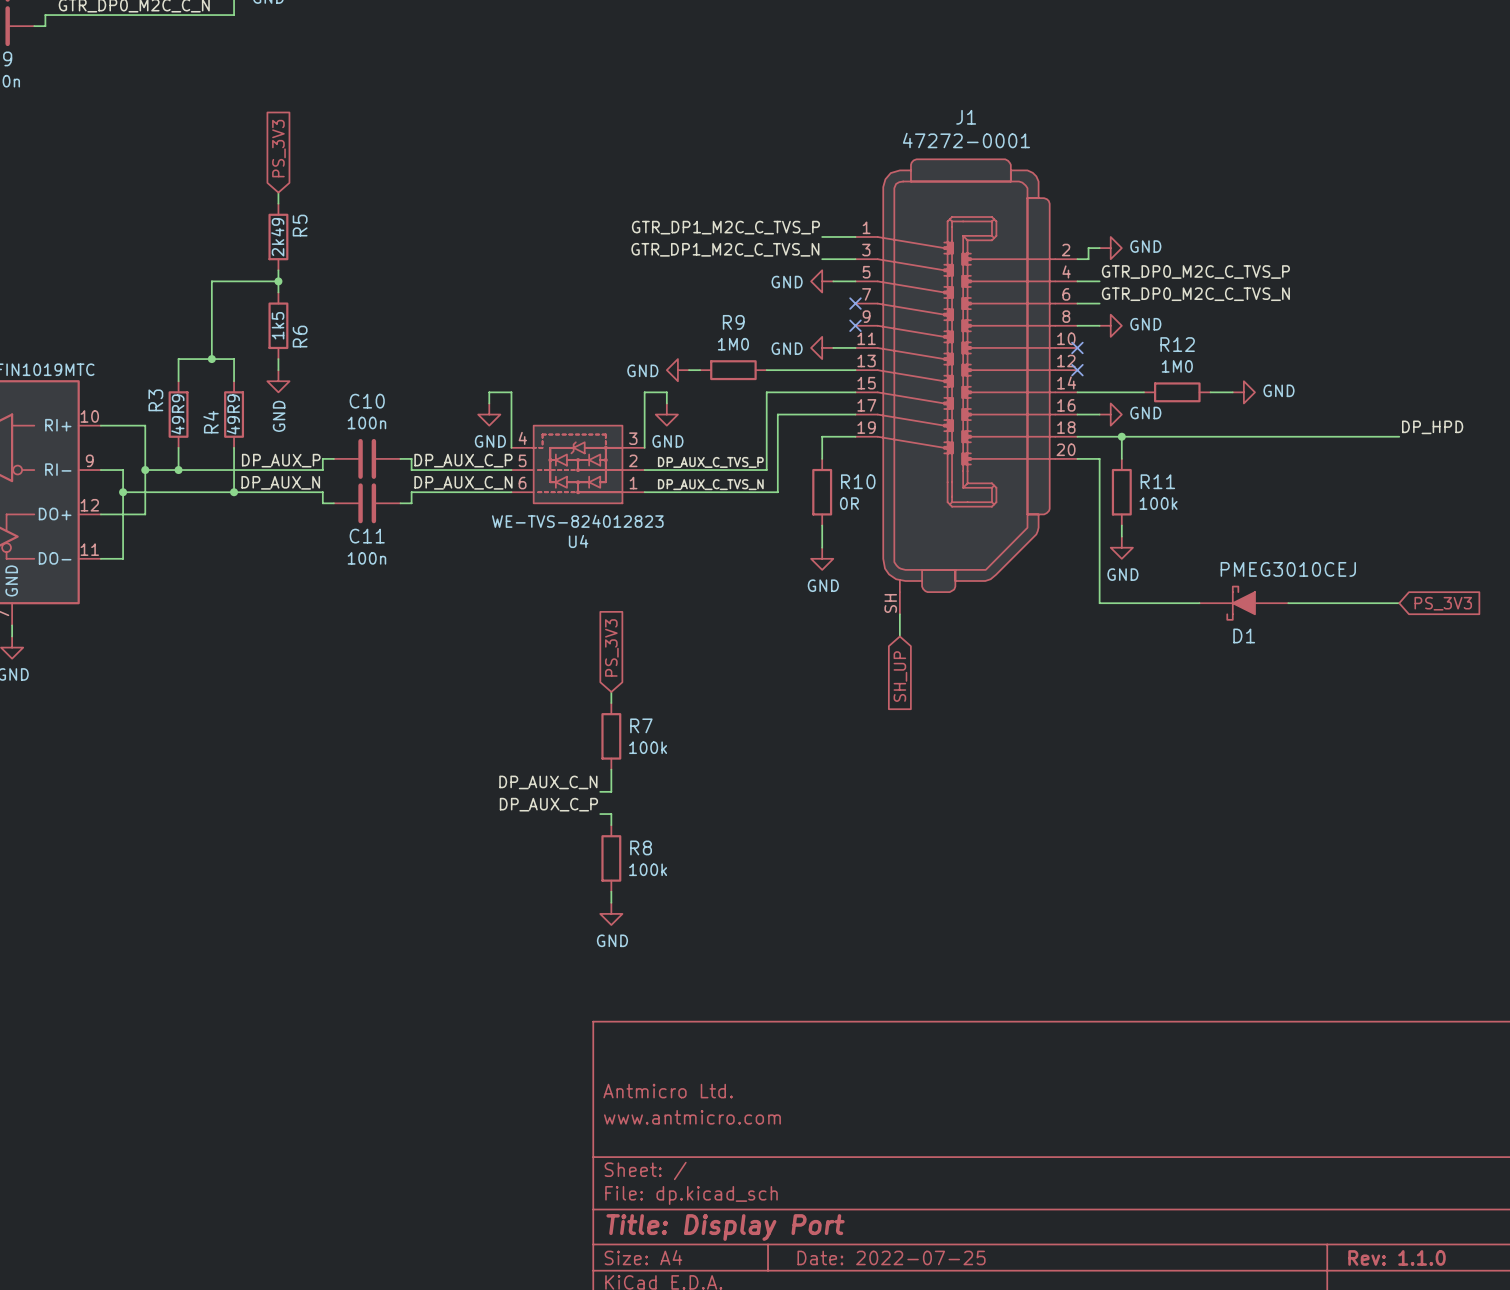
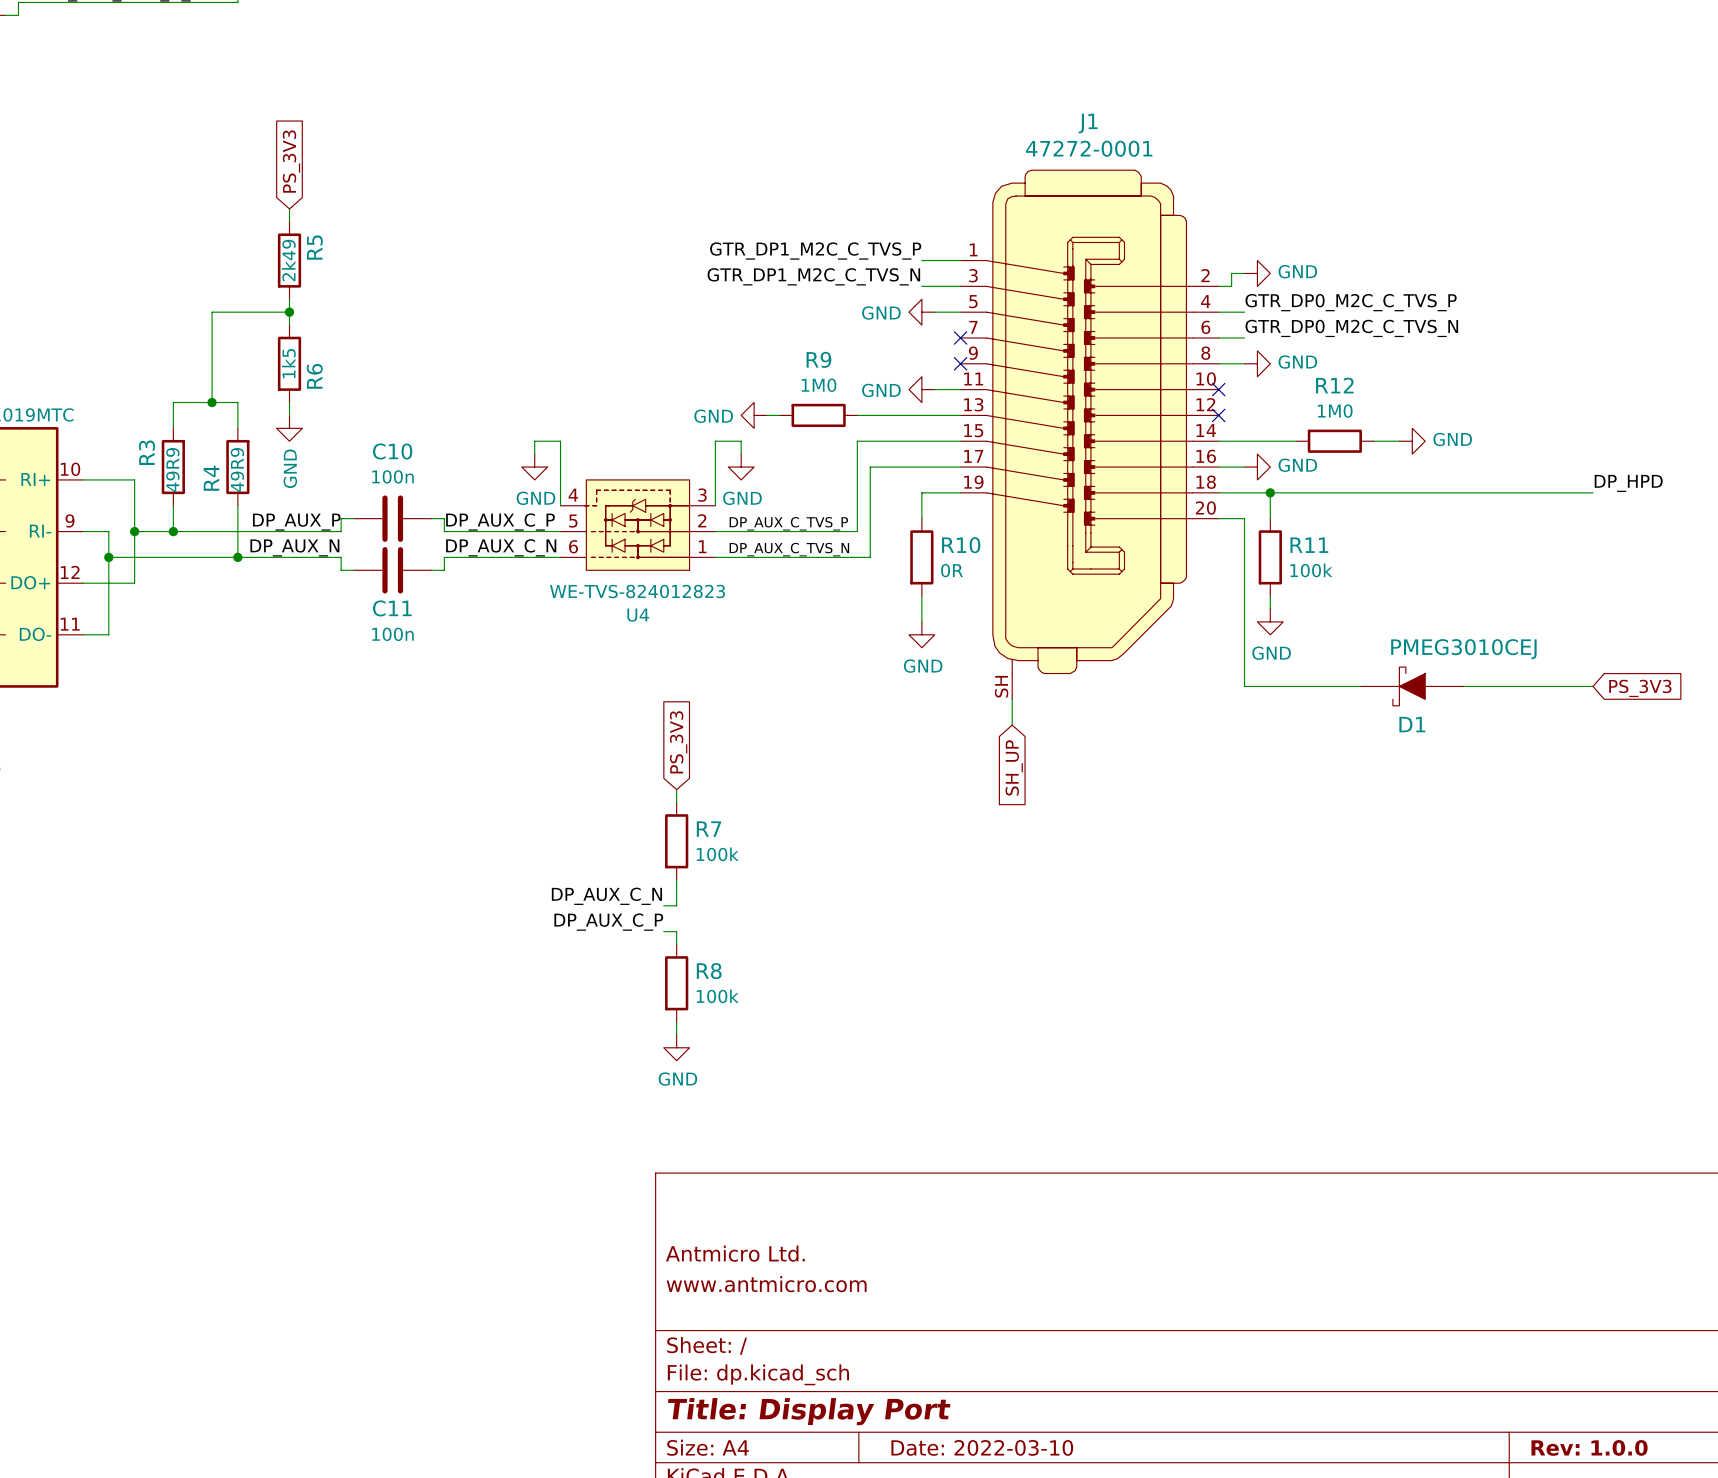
title block: Date: 2022-07-25 (891, 1257) -> Date: 2022-03-10 (982, 1447)
title block: Rev: 1.1.0 (1397, 1257) -> Rev: 1.0.0 (1589, 1447)

